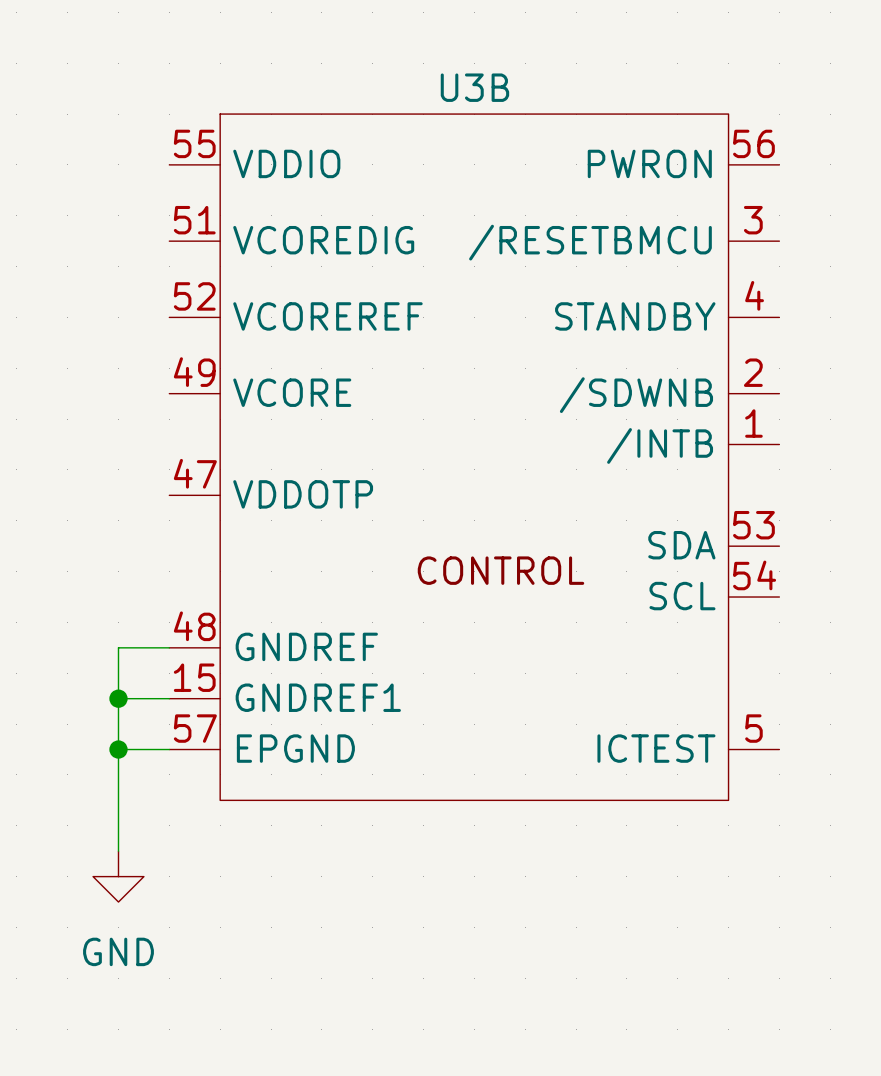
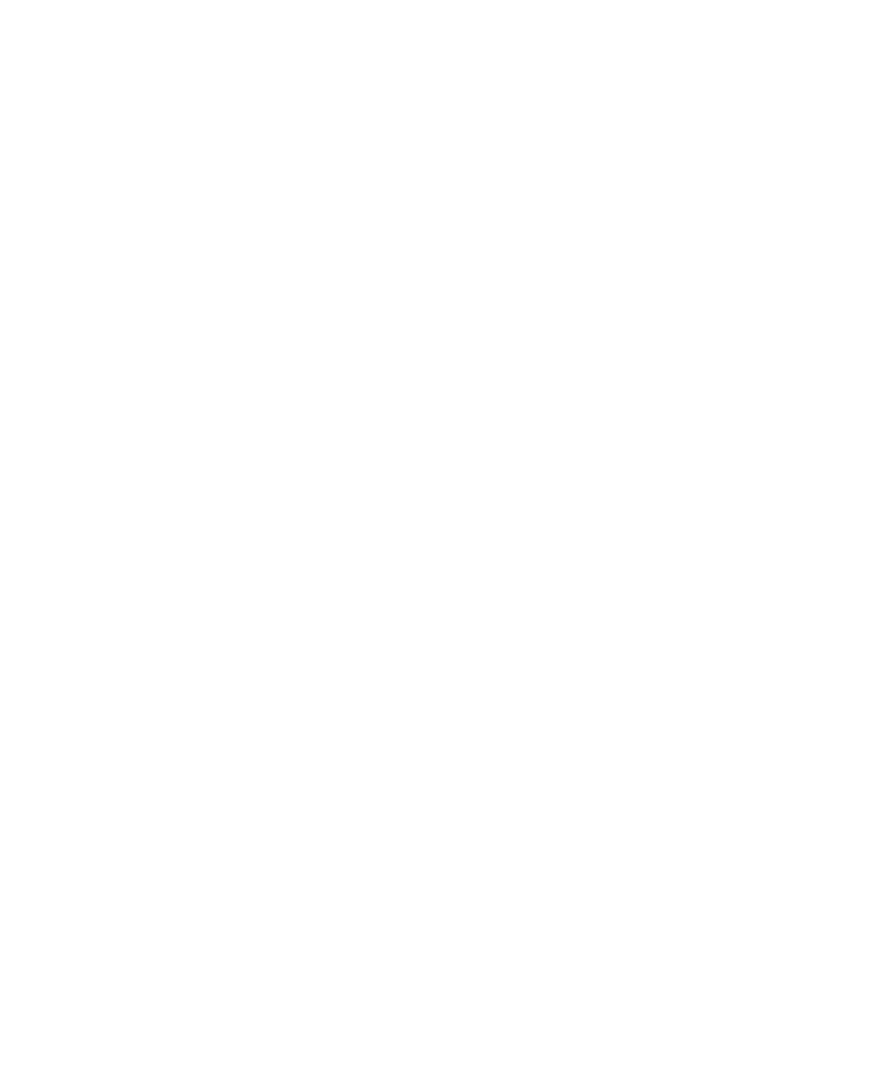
U3B: (474, 457) -> none
wire: (169, 647) (118, 647) (118, 851) -> none
wire: (118, 698) (169, 698) -> none
junction: (118, 698) -> none
wire: (118, 749) (169, 749) -> none
junction: (118, 749) -> none
power symbol: GND (118, 876) -> none

